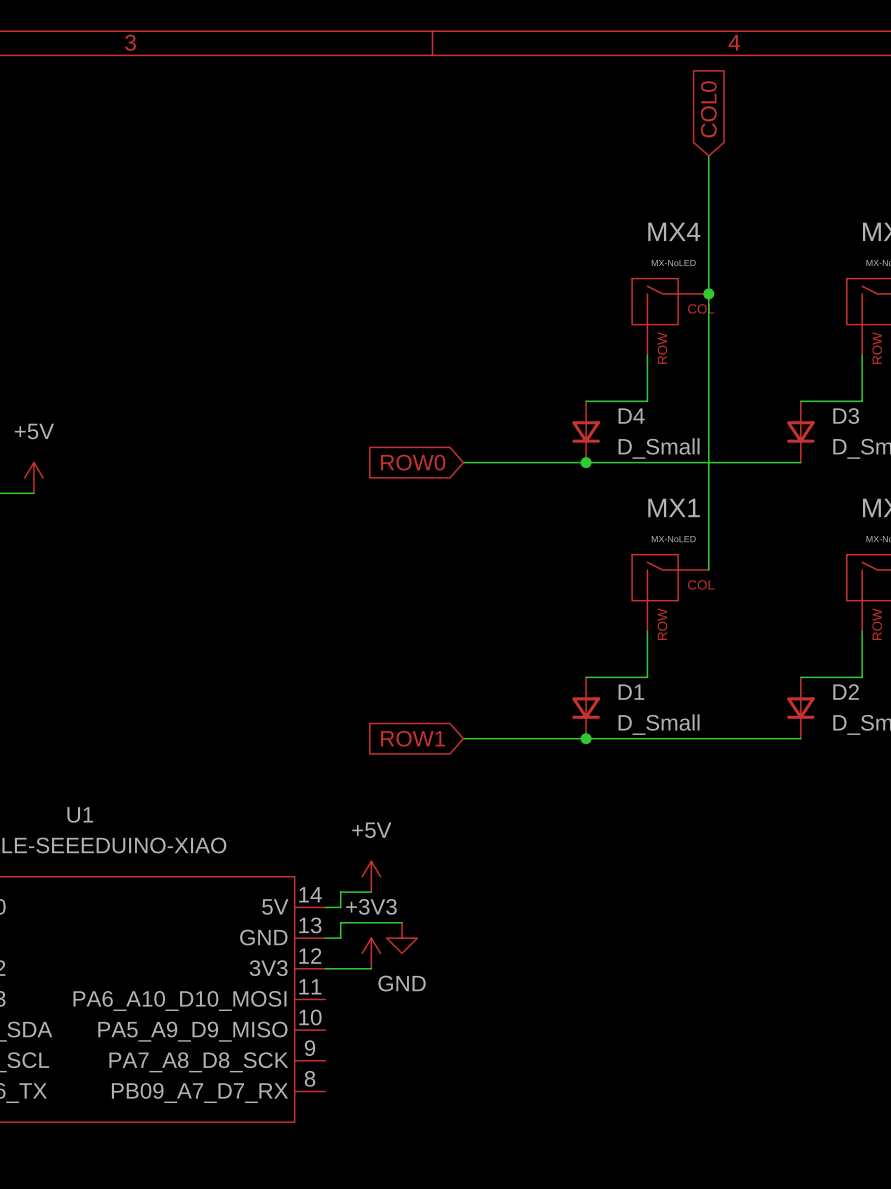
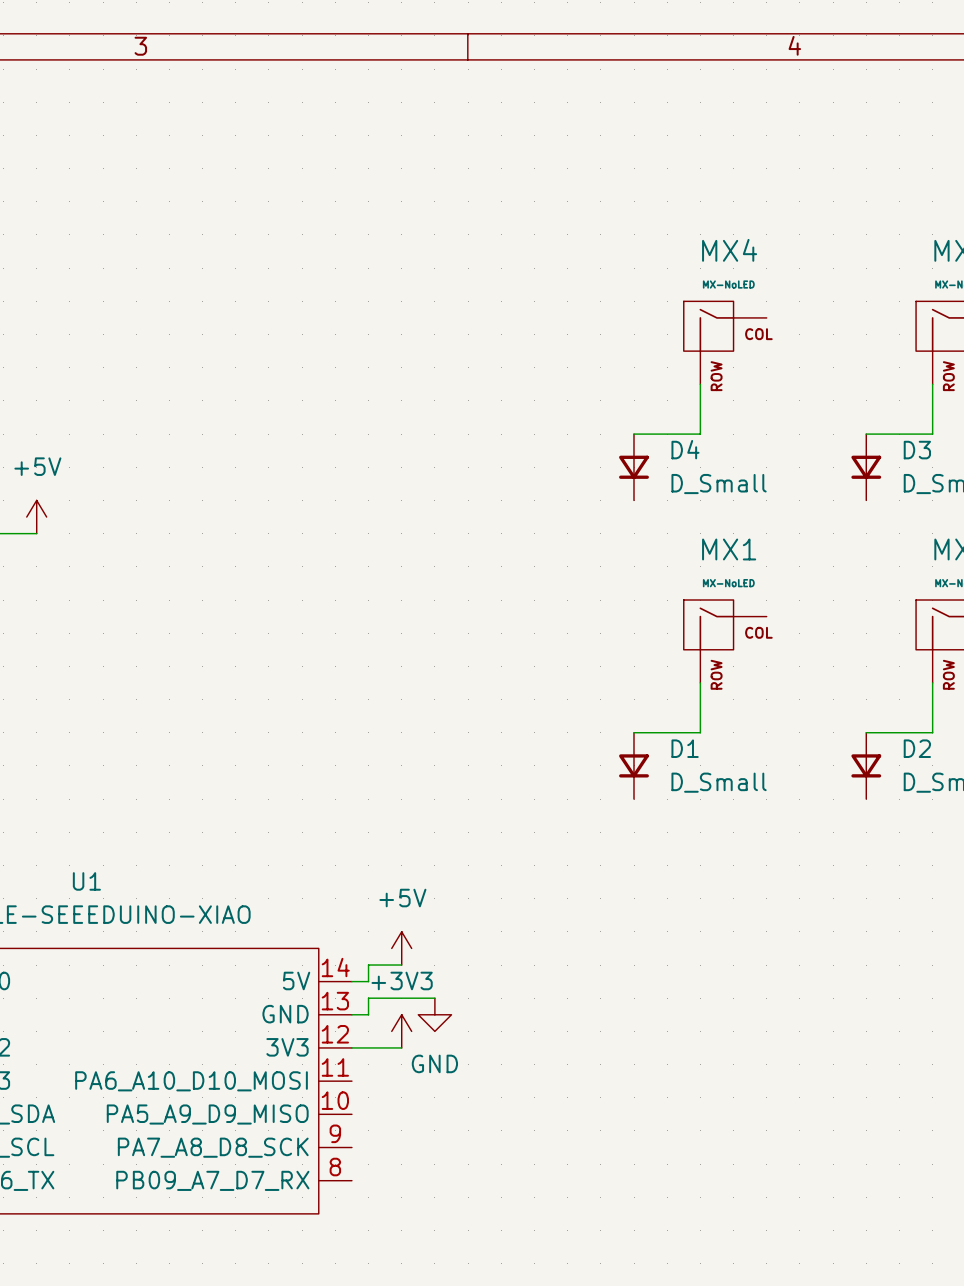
global label: COL0 (708, 109) -> none
wire: (708, 155) (708, 570) -> none
junction: (708, 293) -> none
global label: ROW0 (413, 462) -> none
wire: (463, 462) (800, 462) -> none
junction: (586, 462) -> none
global label: ROW1 (413, 738) -> none
wire: (463, 738) (800, 738) -> none
junction: (586, 738) -> none

